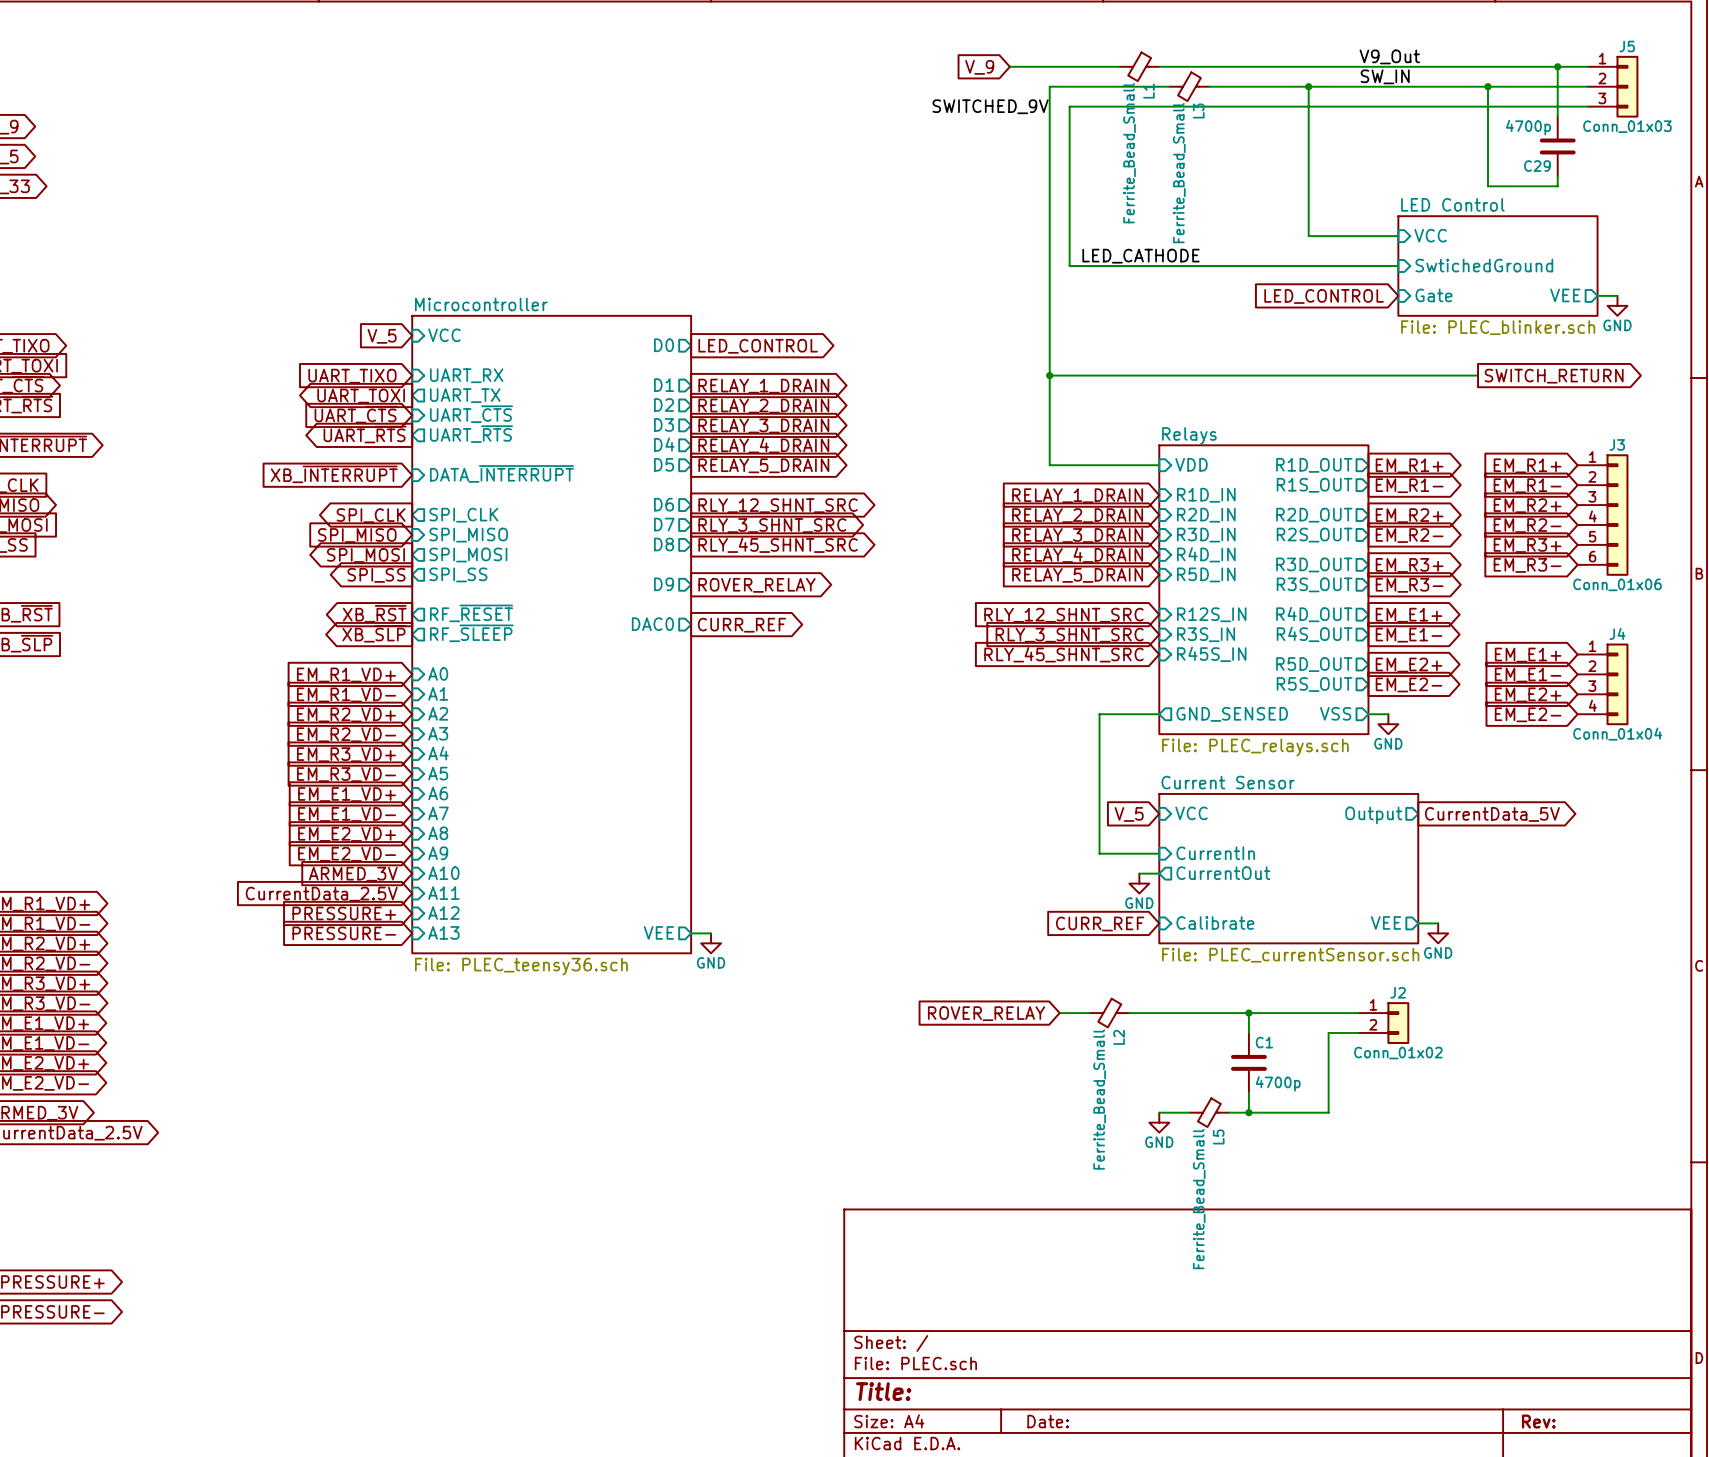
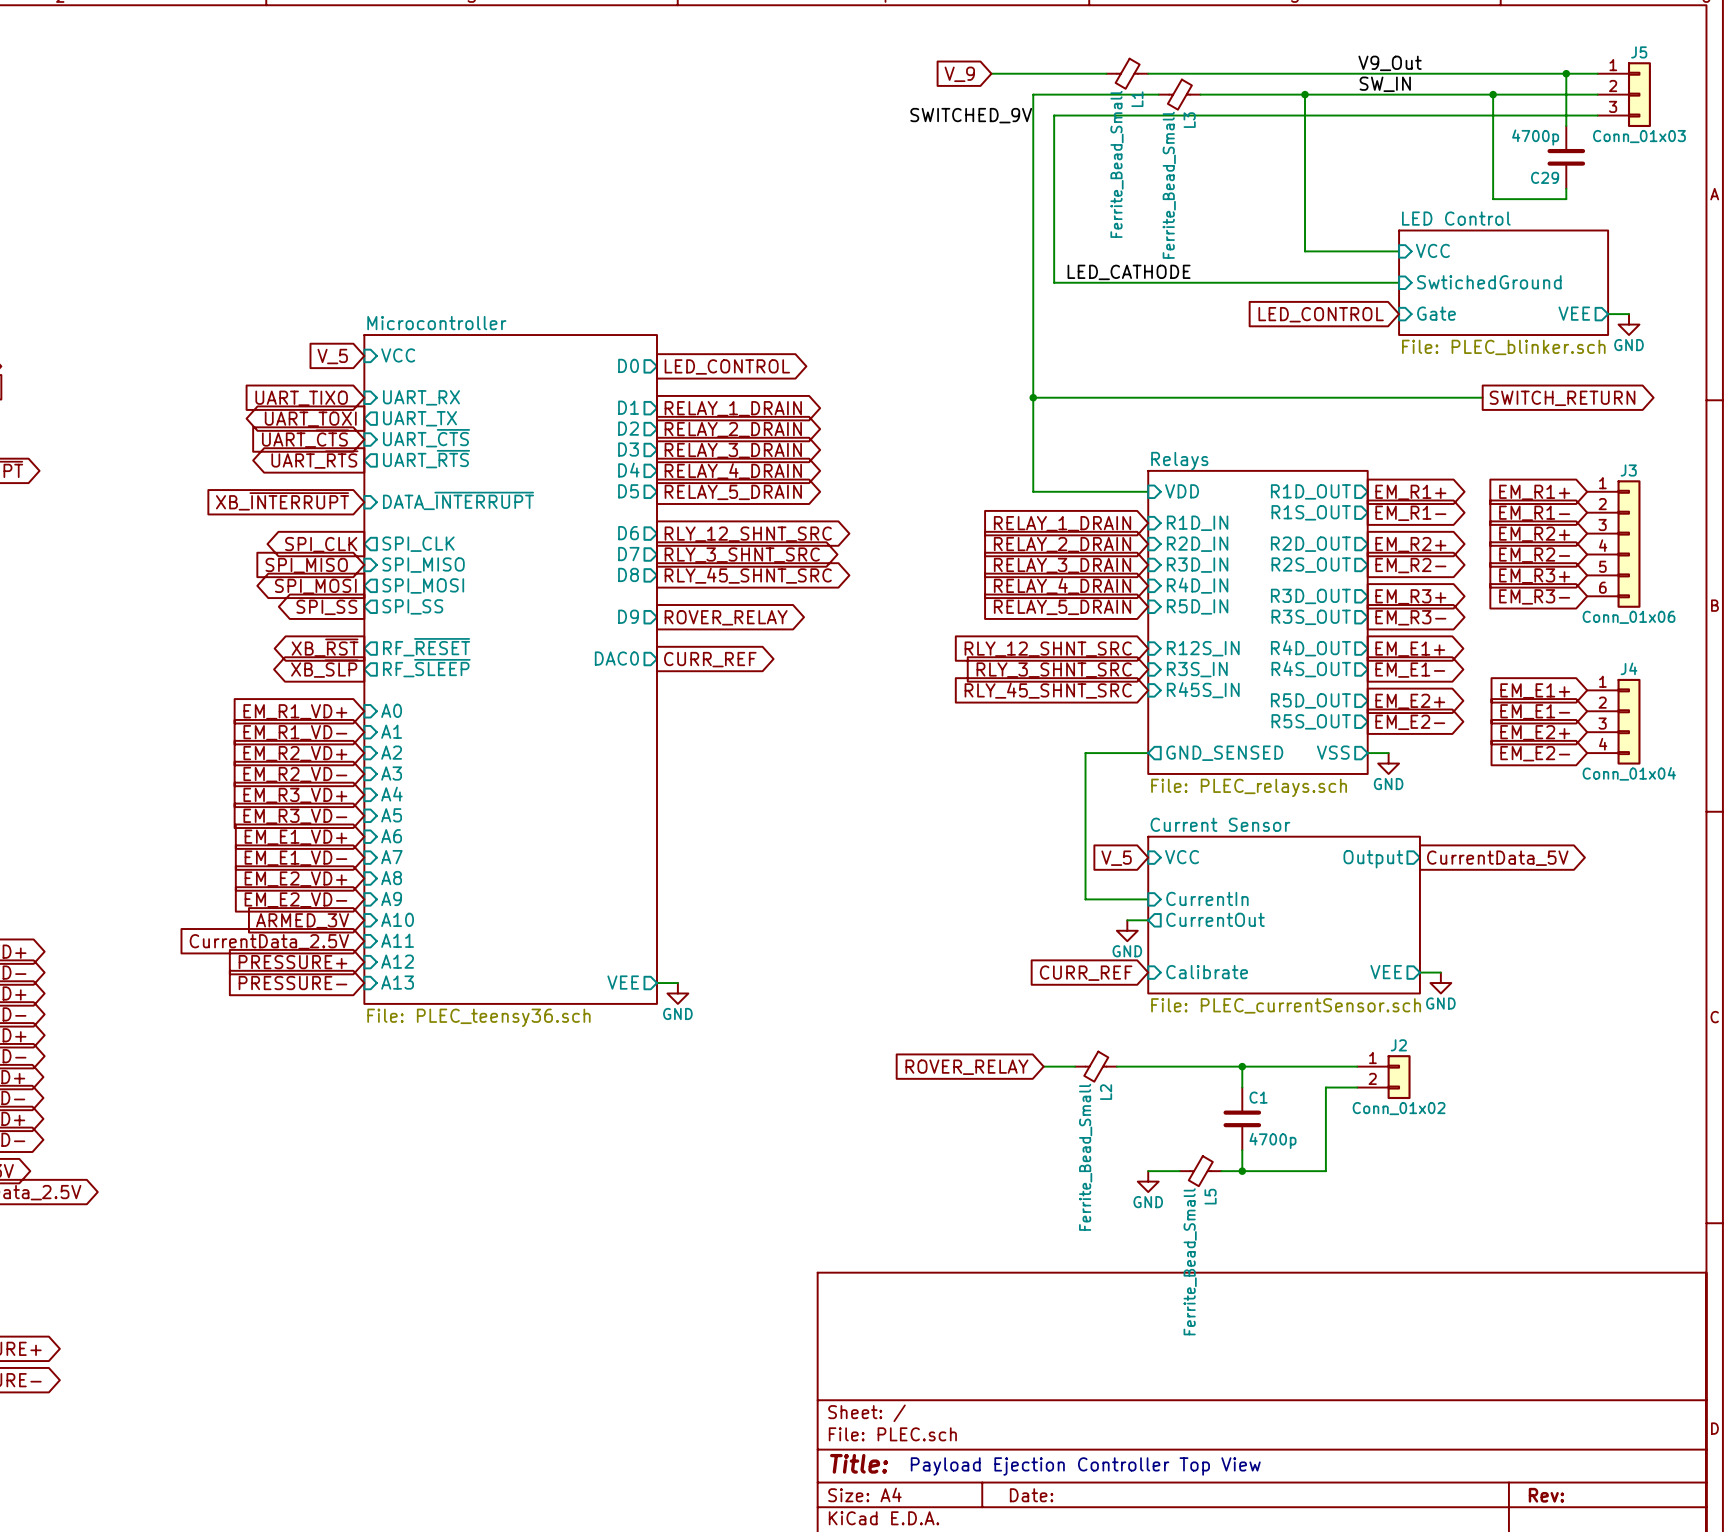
text: none -> Payload Ejection Controller Top View (1085, 1466)

